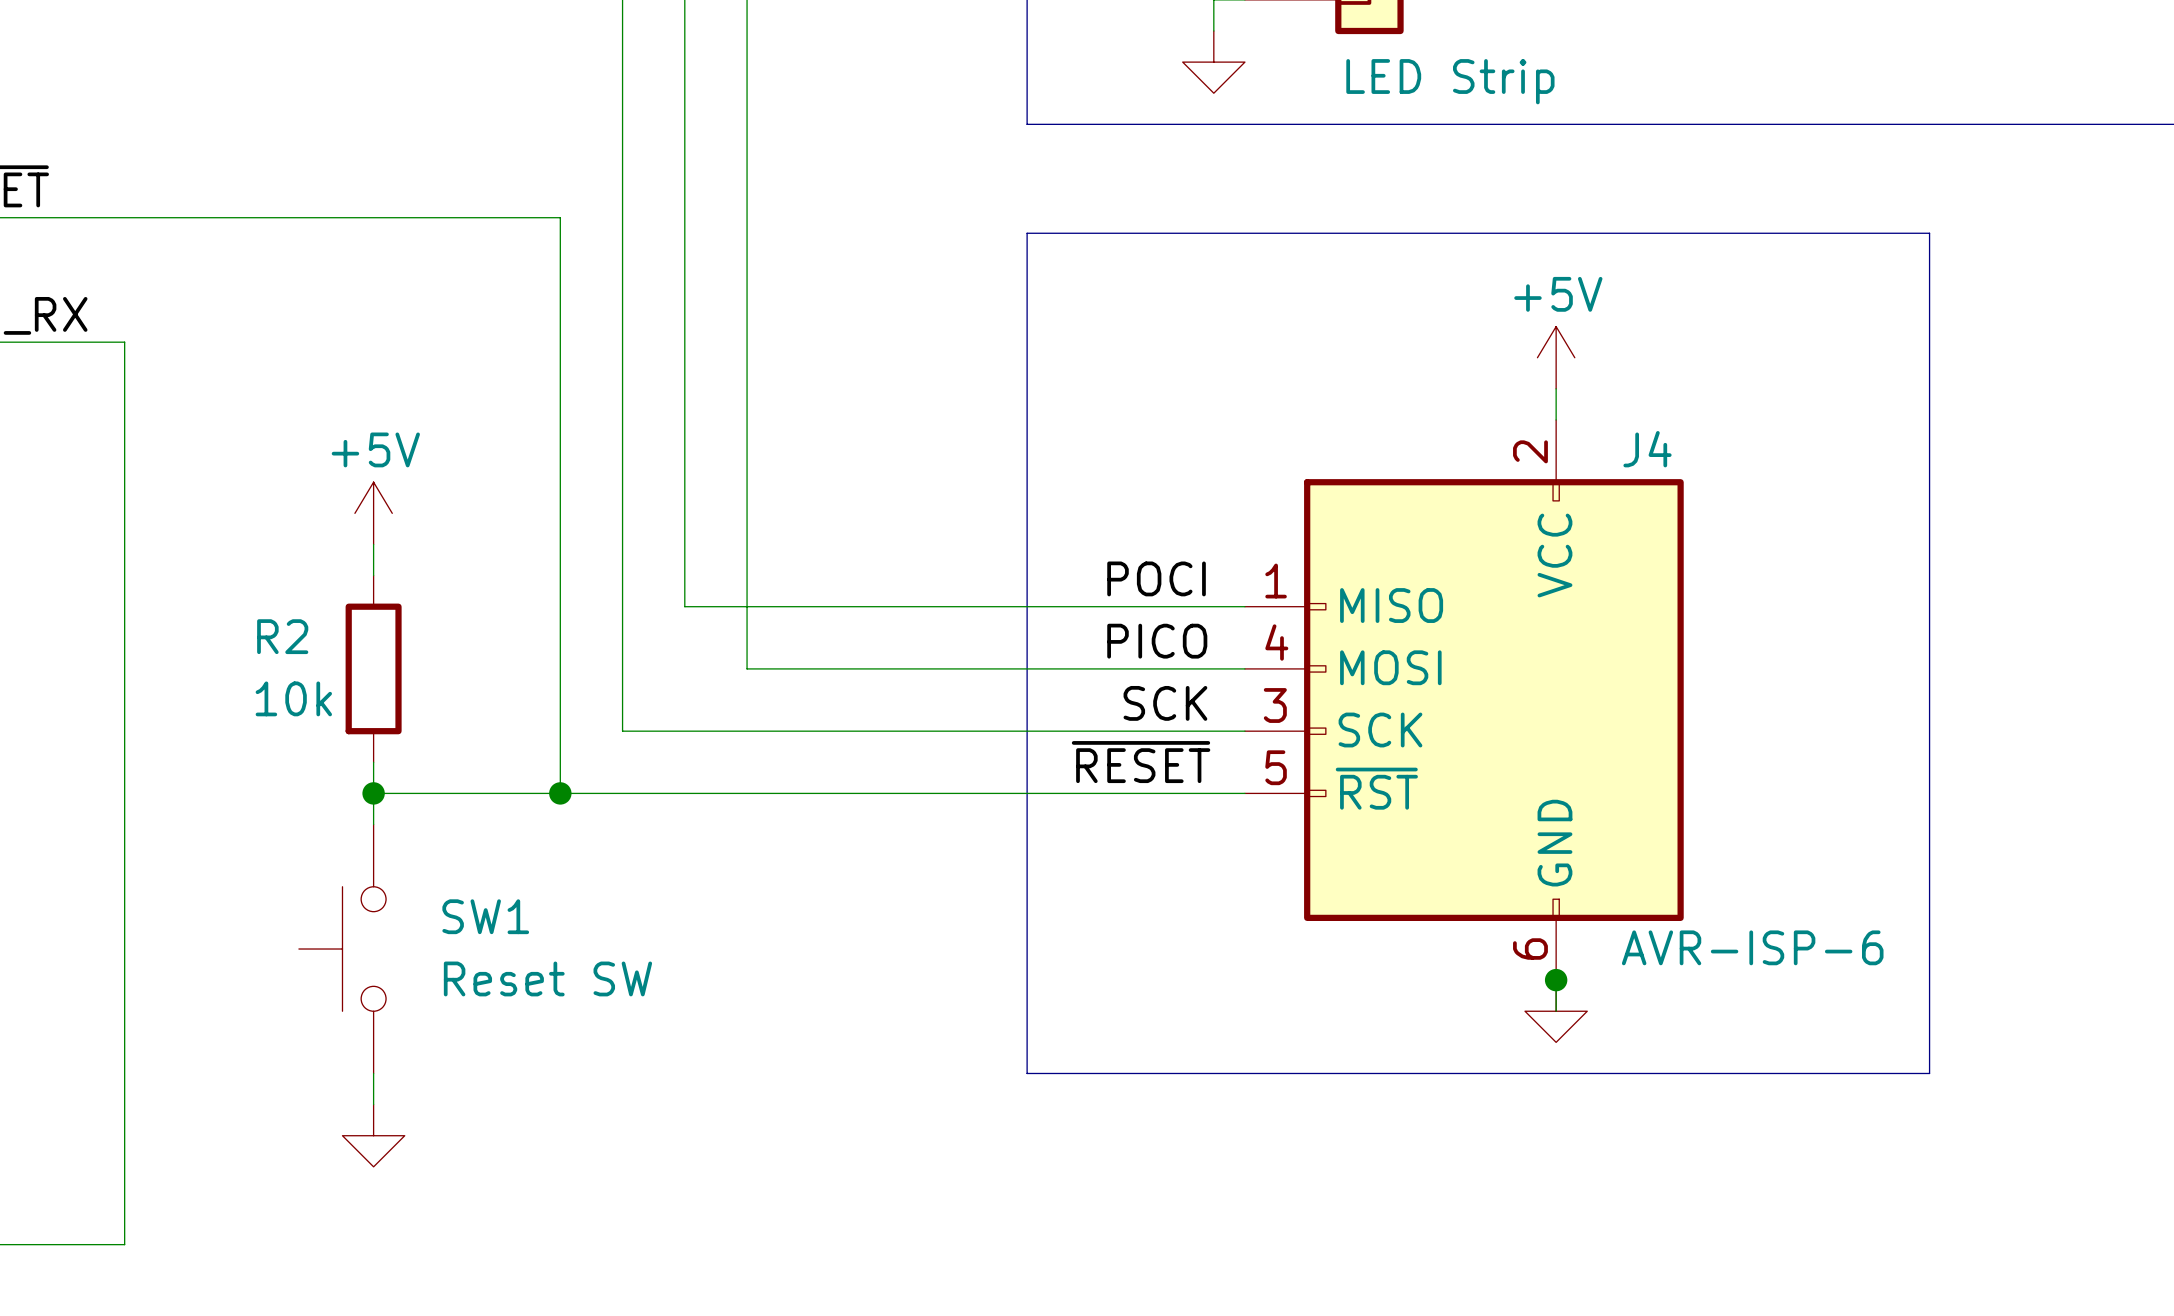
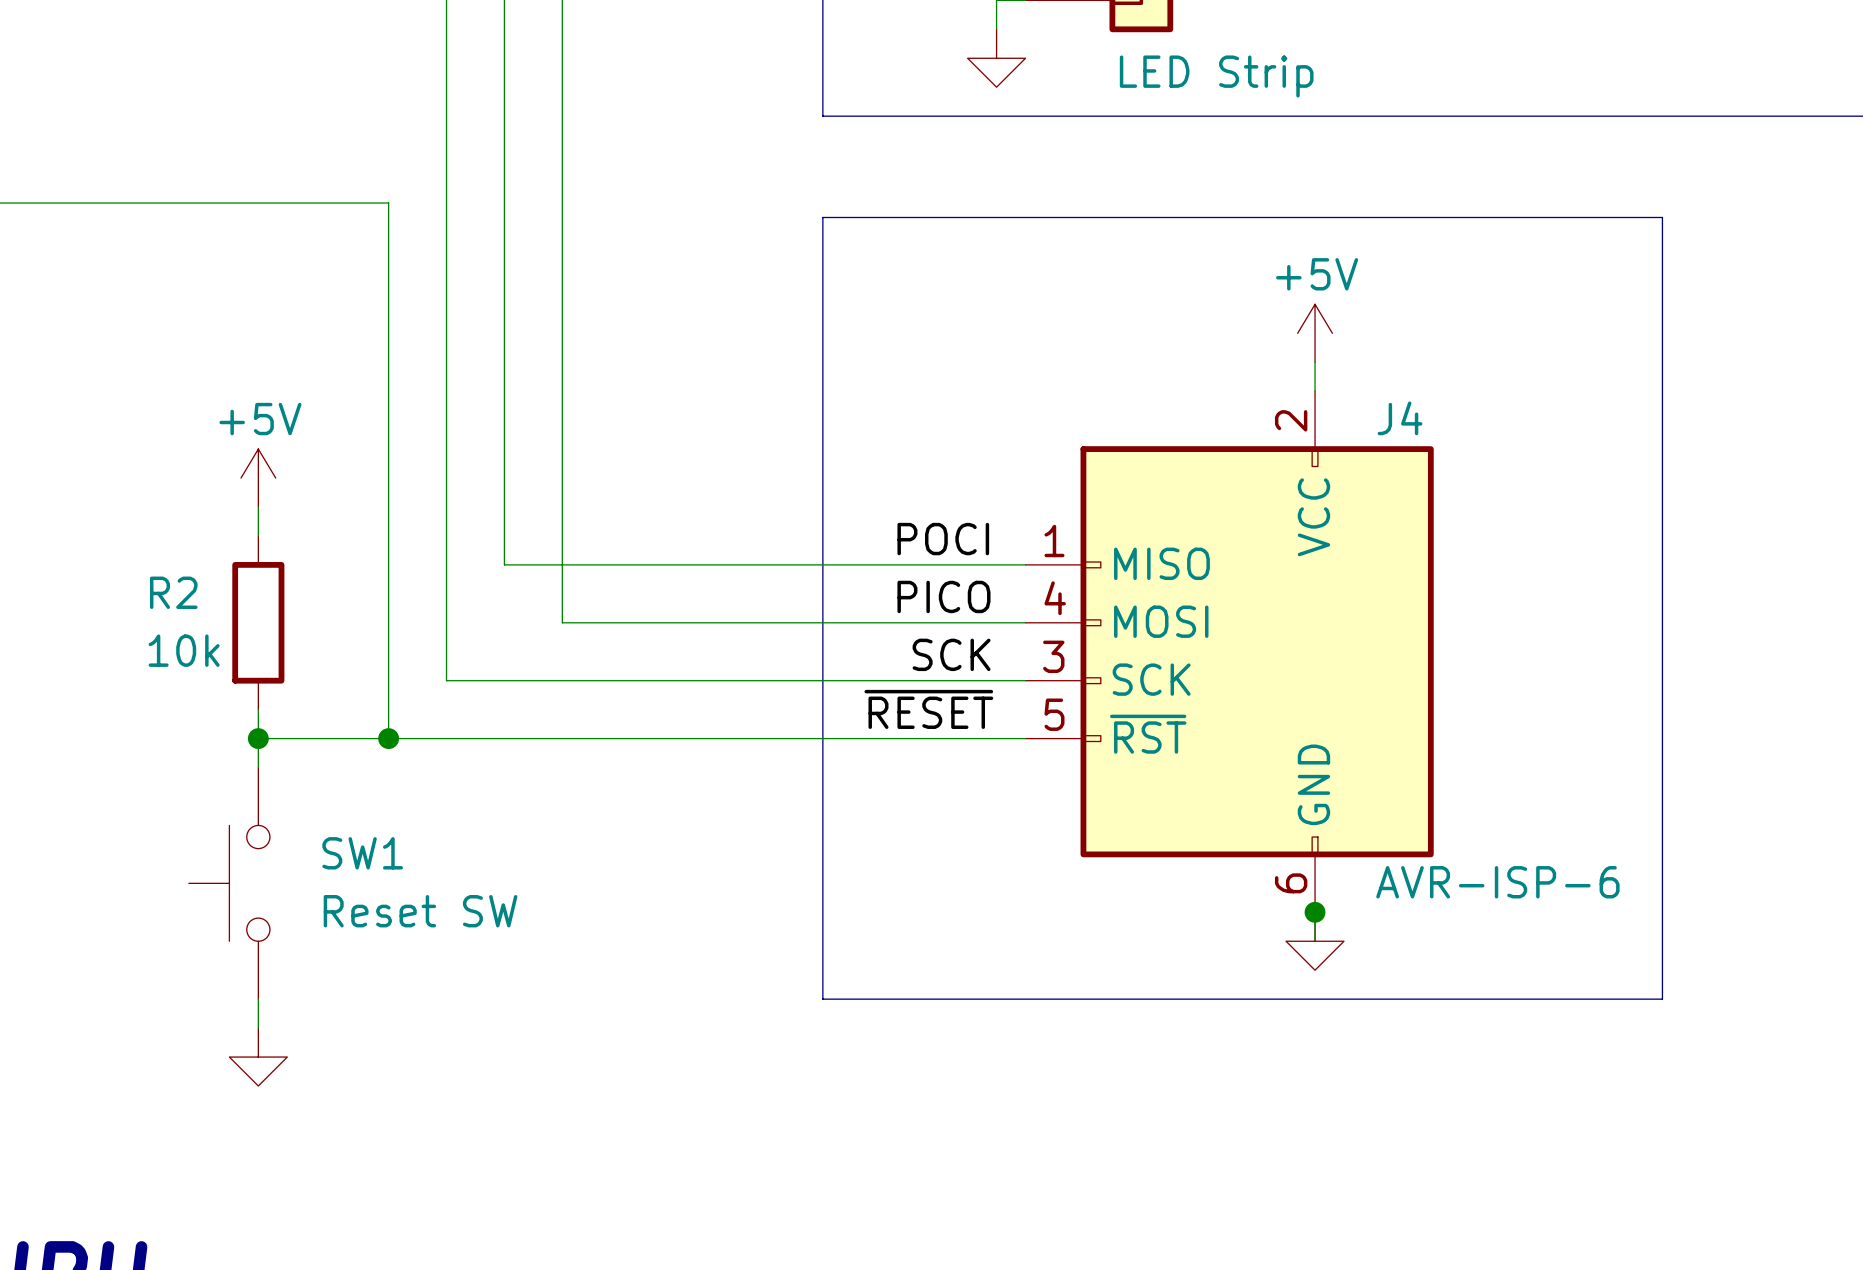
power symbol position: +5V (373, 513) -> +5V (258, 478)
wire: (373, 544) (373, 575) -> (258, 506) (258, 535)
R2 position: (373, 668) -> (258, 622)
wire: (373, 762) (373, 824) -> (258, 709) (258, 767)
wire: (373, 793) (420, 793) -> none
junction position: (373, 793) -> (258, 738)
SW1 position: (342, 949) -> (229, 883)
wire: (373, 1073) (373, 1104) -> (258, 999) (258, 1028)
power symbol position: (373, 1135) -> (258, 1057)

